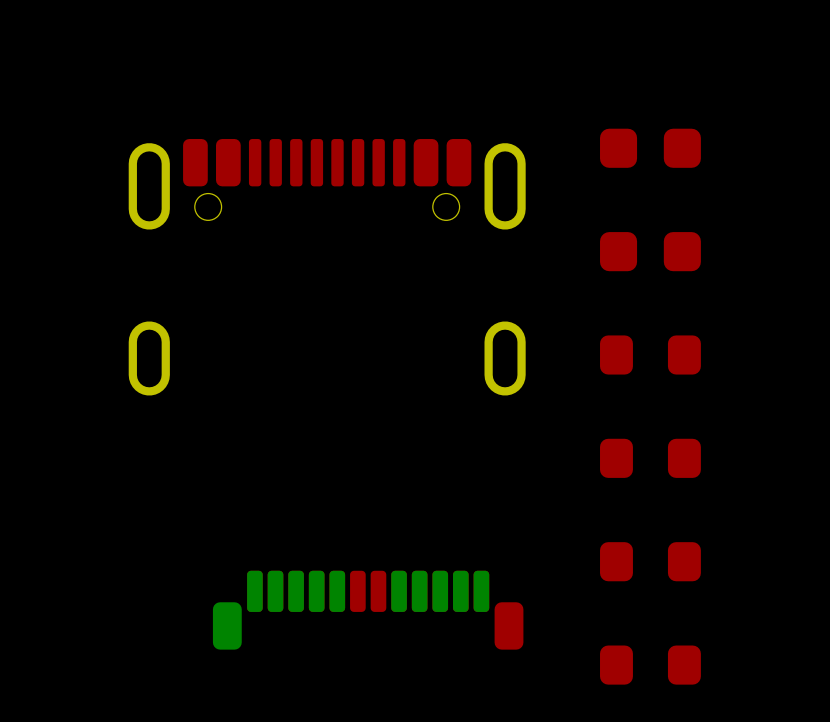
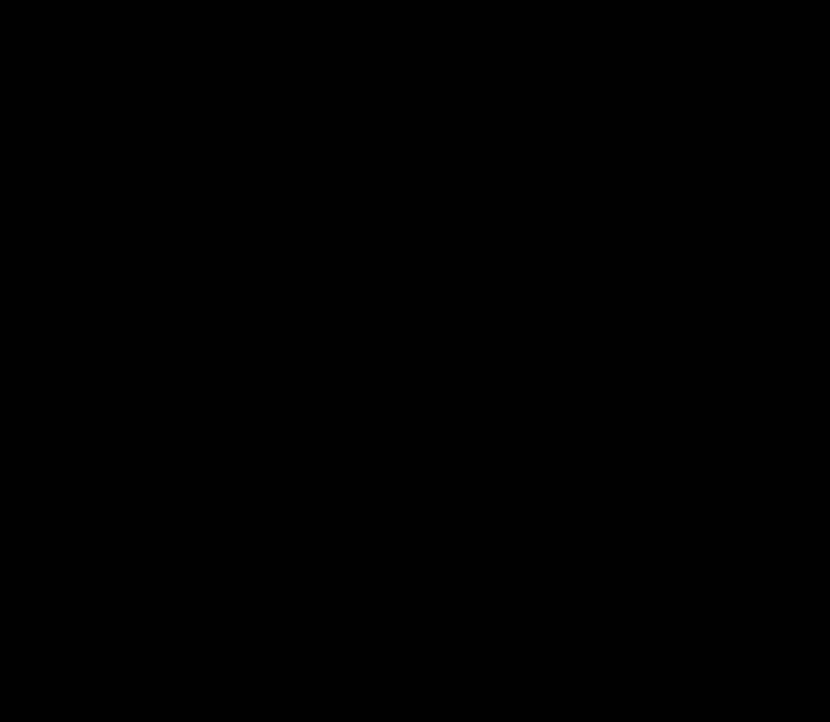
part: (650, 148) -> none
part: (650, 251) -> none
part: (327, 267) -> none
part: (650, 354) -> none
part: (650, 458) -> none
part: (650, 561) -> none
part: (368, 610) -> none
part: (650, 665) -> none

